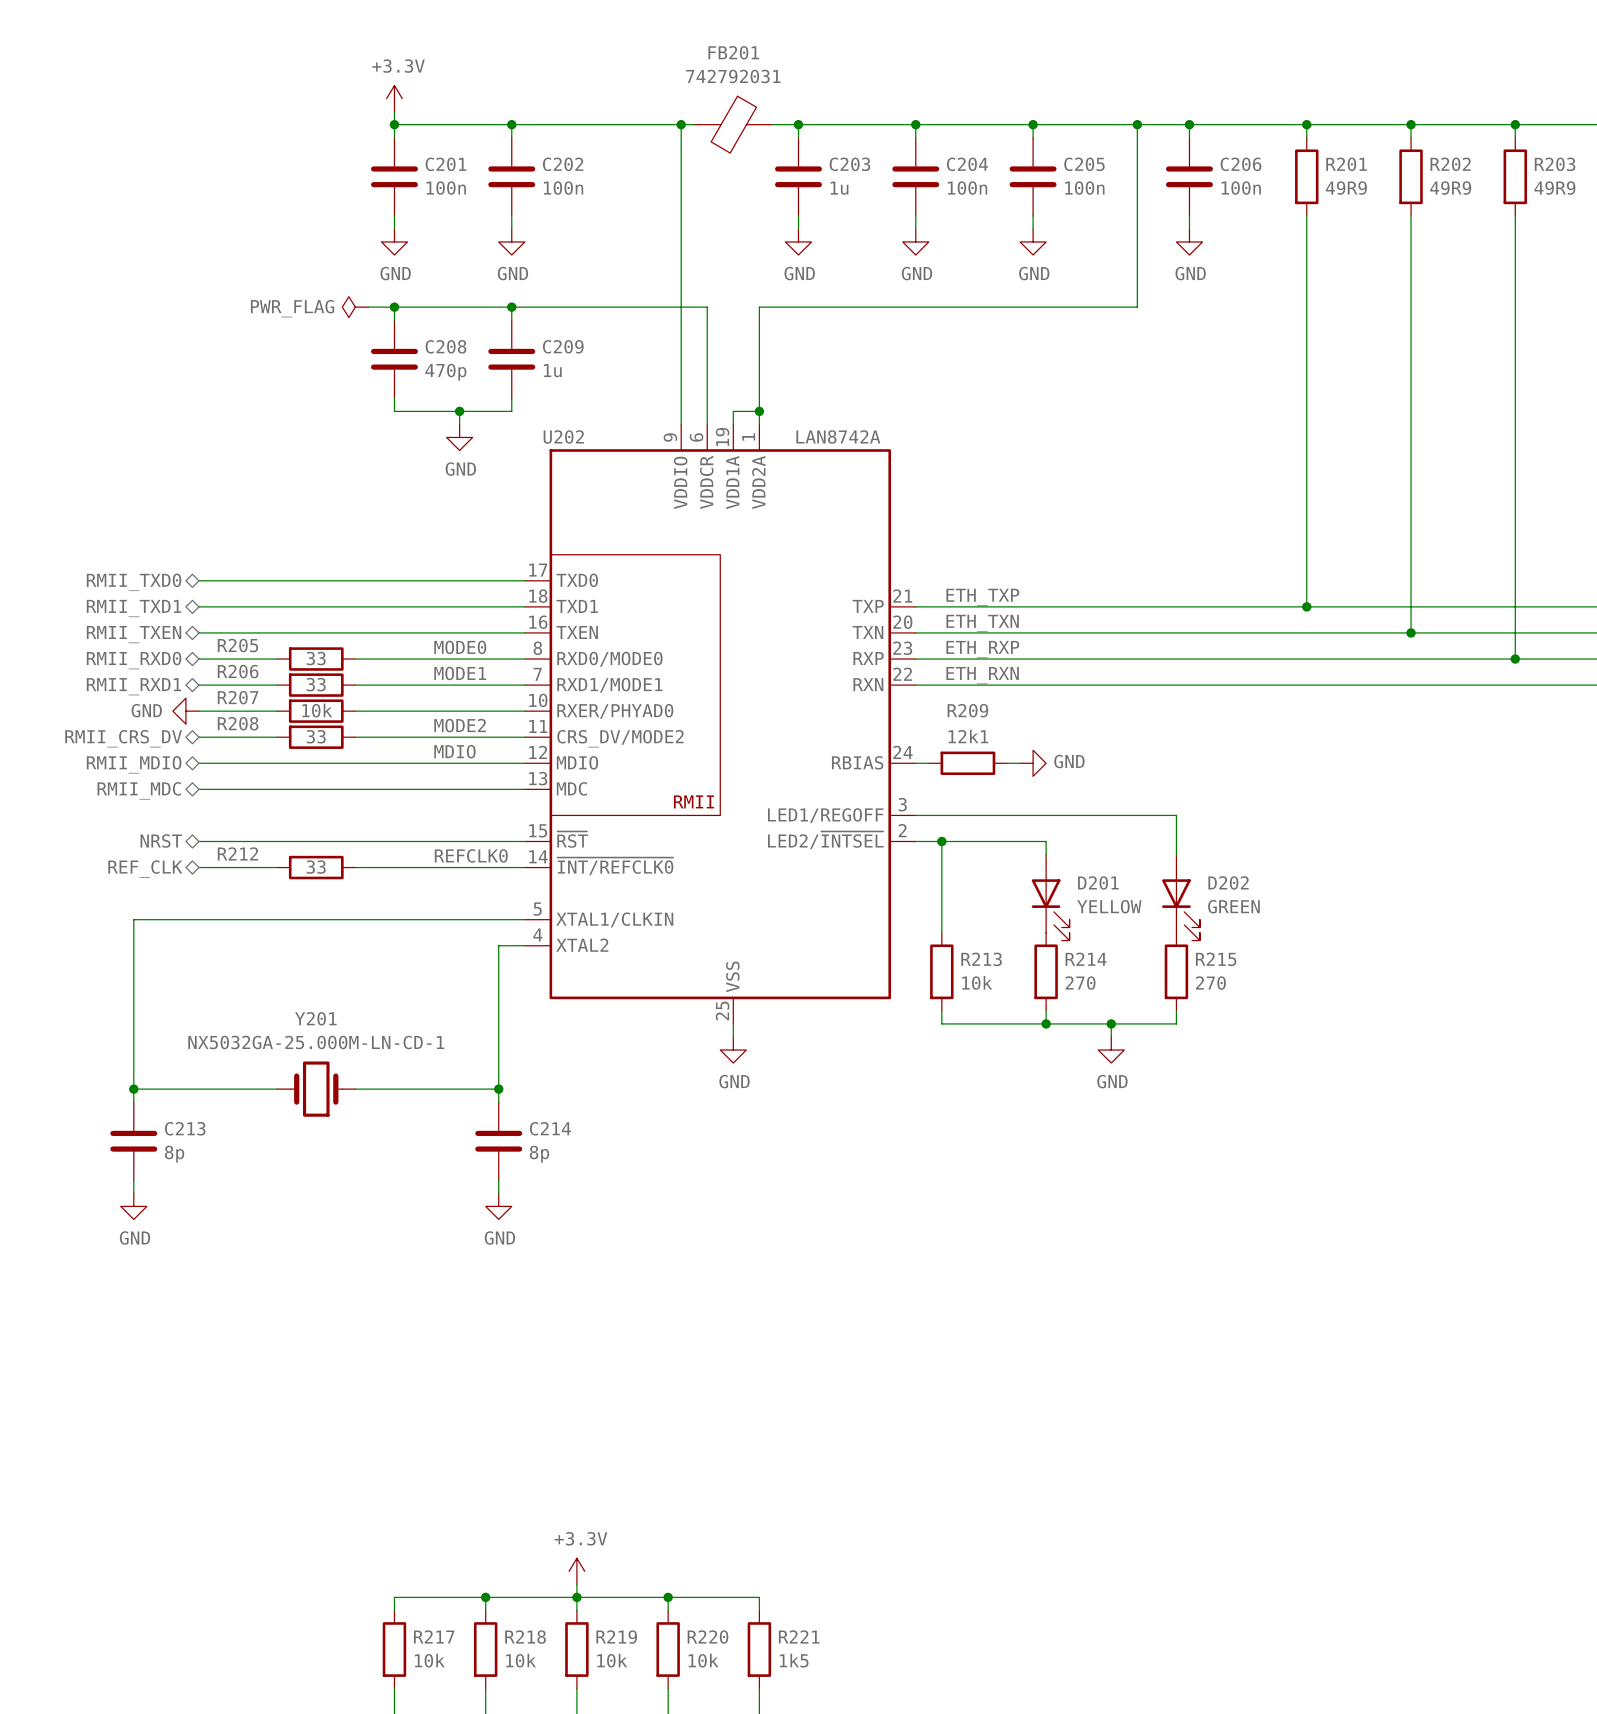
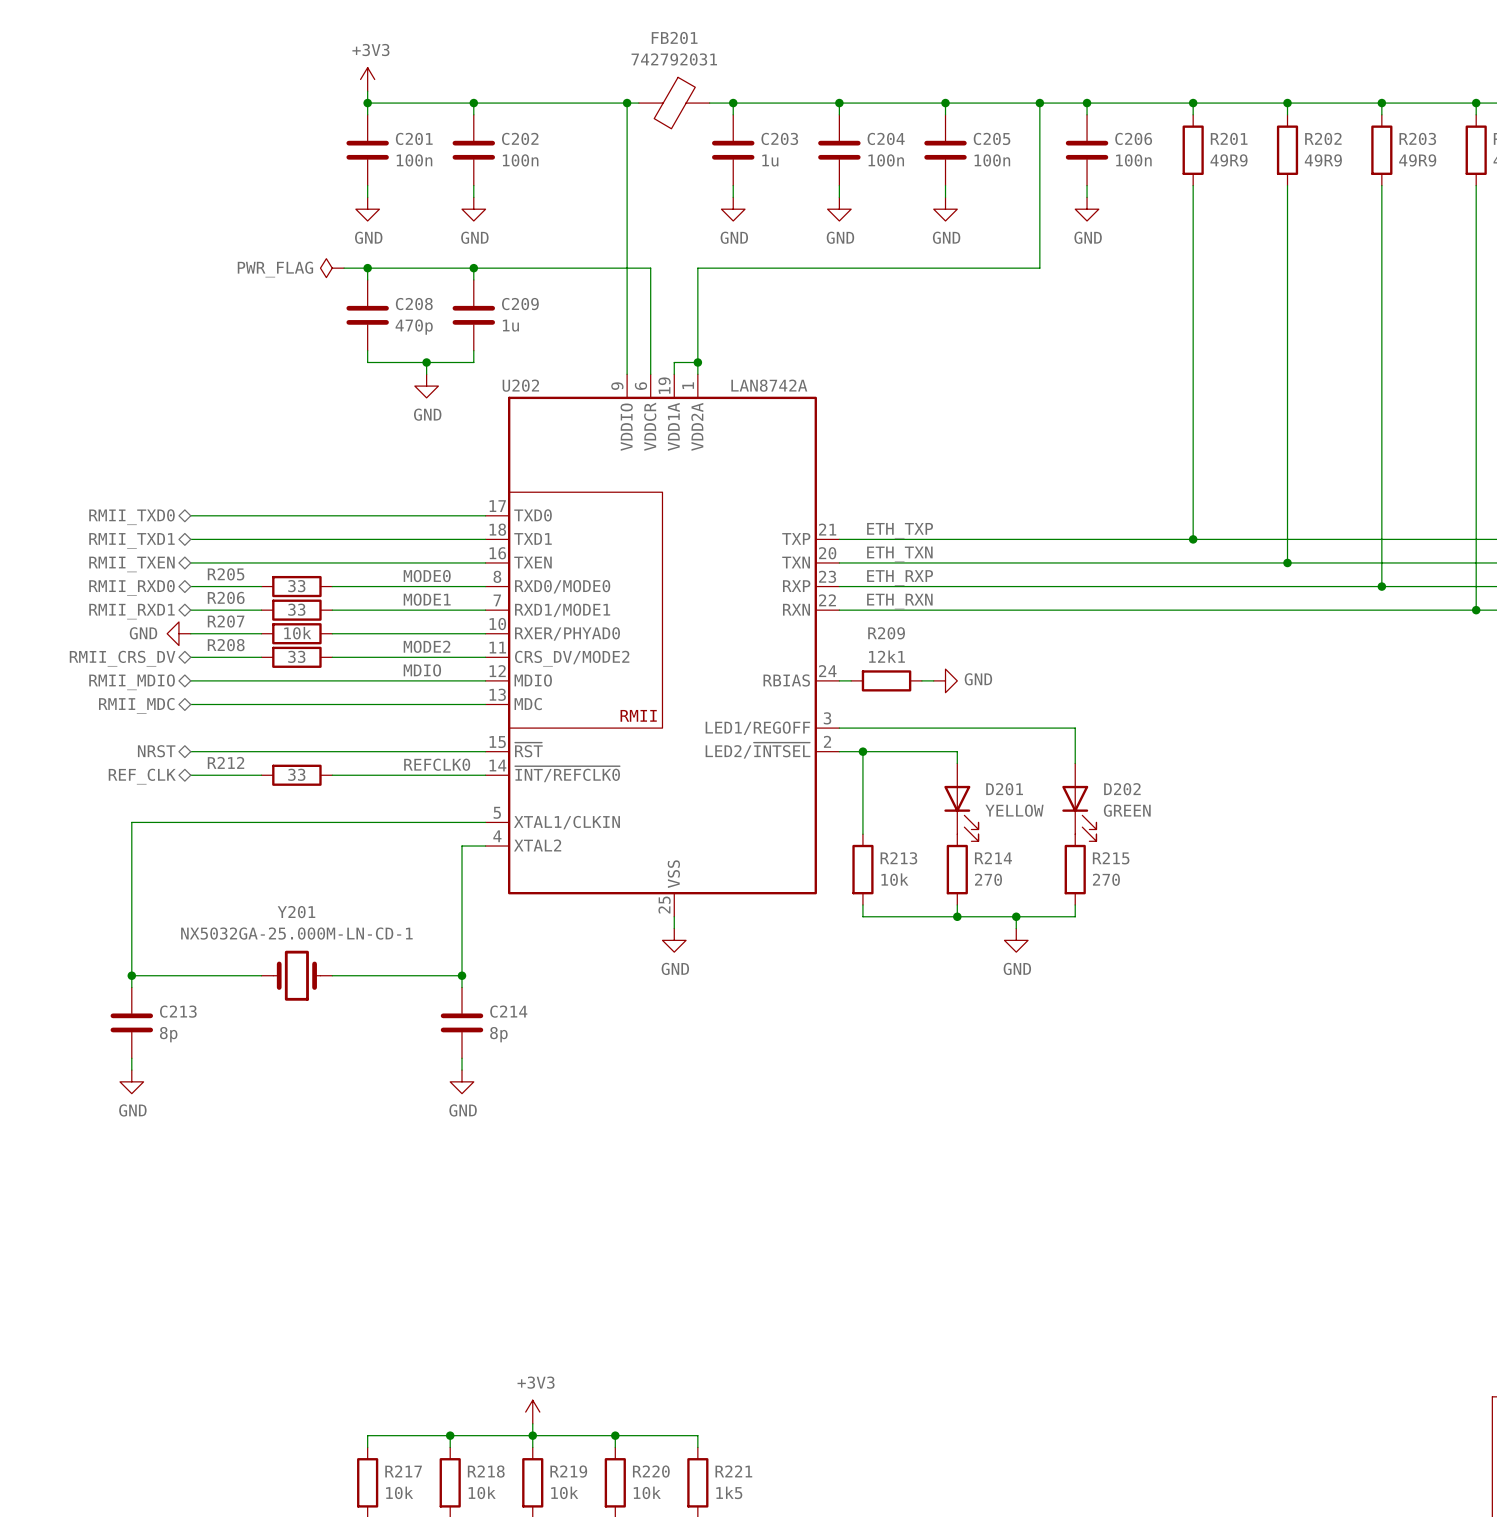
power symbol: +3.3V (394, 98) -> +3V3 (367, 79)
power symbol: +3.3V (576, 1571) -> +3V3 (532, 1412)

